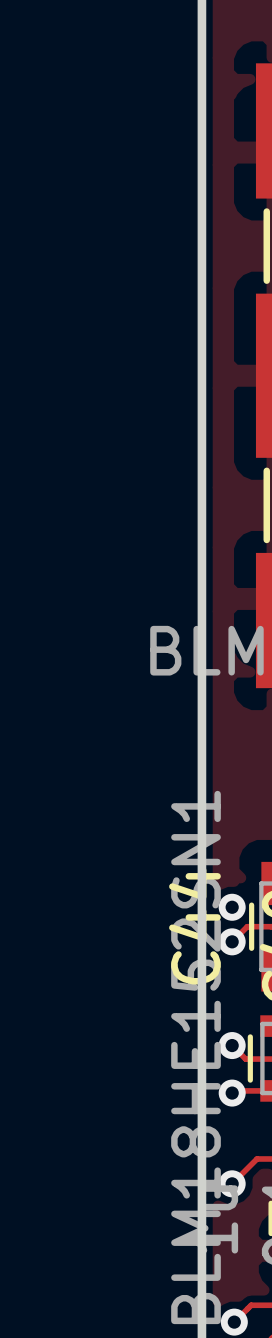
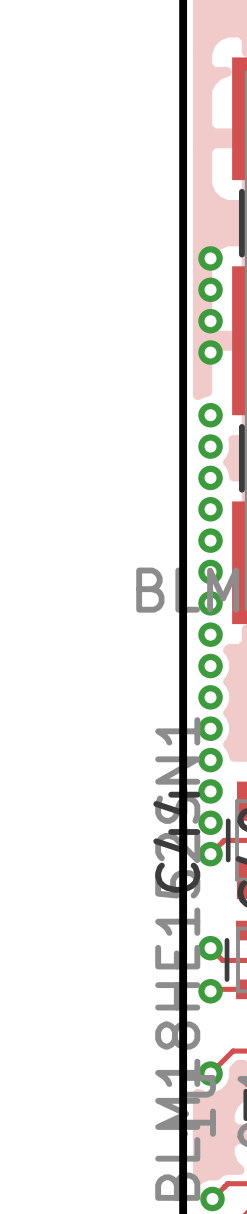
via: none -> (210, 258)
via: none -> (210, 289)
via: none -> (210, 321)
via: none -> (210, 352)
via: none -> (210, 415)
via: none -> (210, 446)
via: none -> (210, 477)
via: none -> (210, 509)
via: none -> (210, 540)
via: none -> (210, 571)
via: none -> (210, 603)
via: none -> (210, 634)
via: none -> (210, 666)
via: none -> (210, 697)
via: none -> (210, 728)
via: none -> (210, 760)
via: none -> (210, 791)

